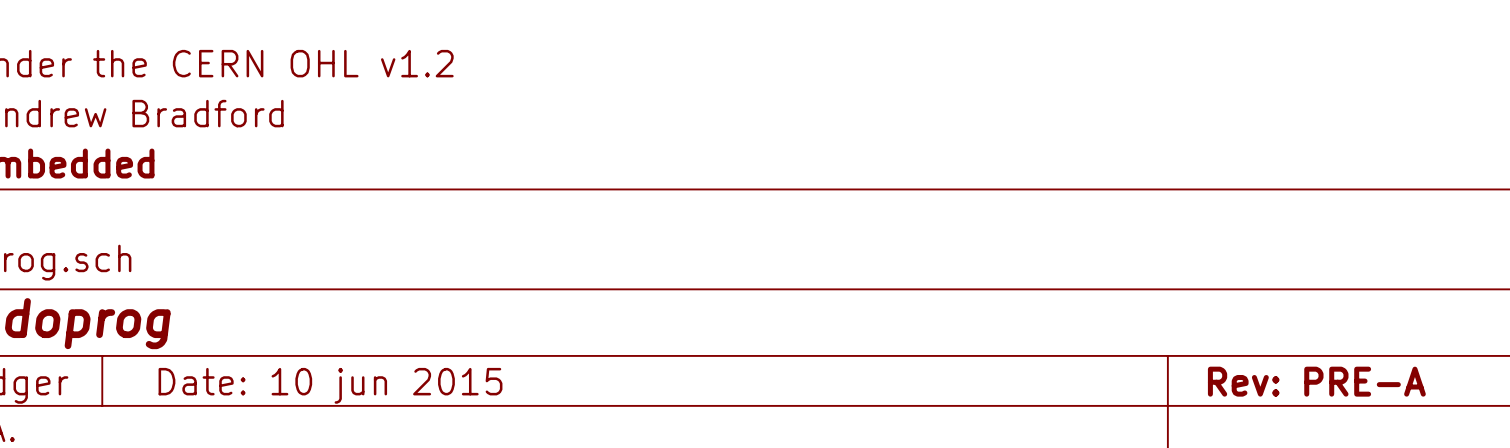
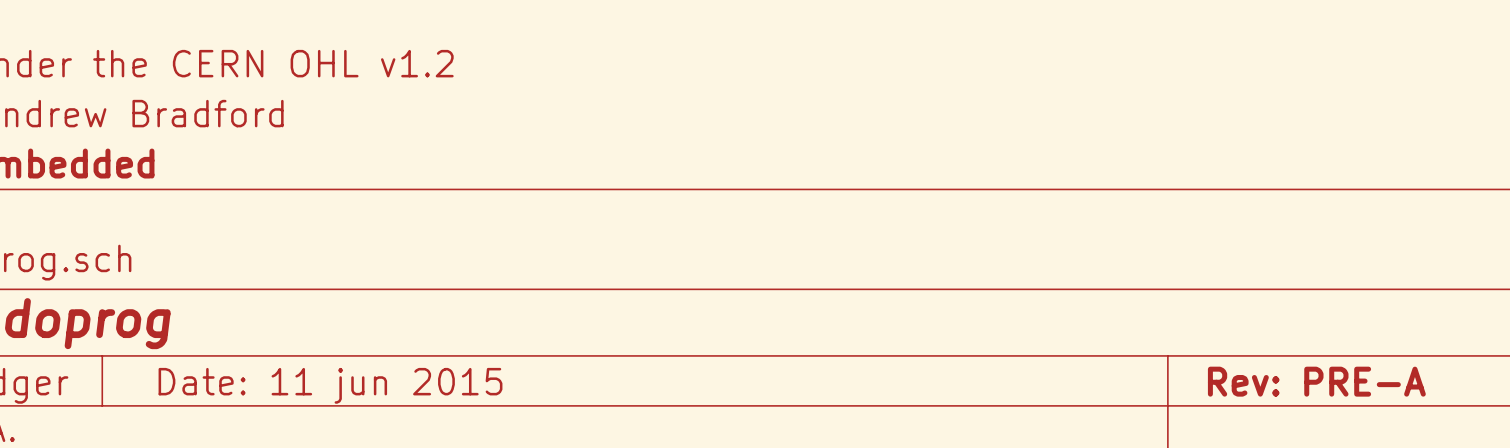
title block: Date: 10 jun 2015 (330, 385) -> Date: 11 jun 2015 (330, 385)

